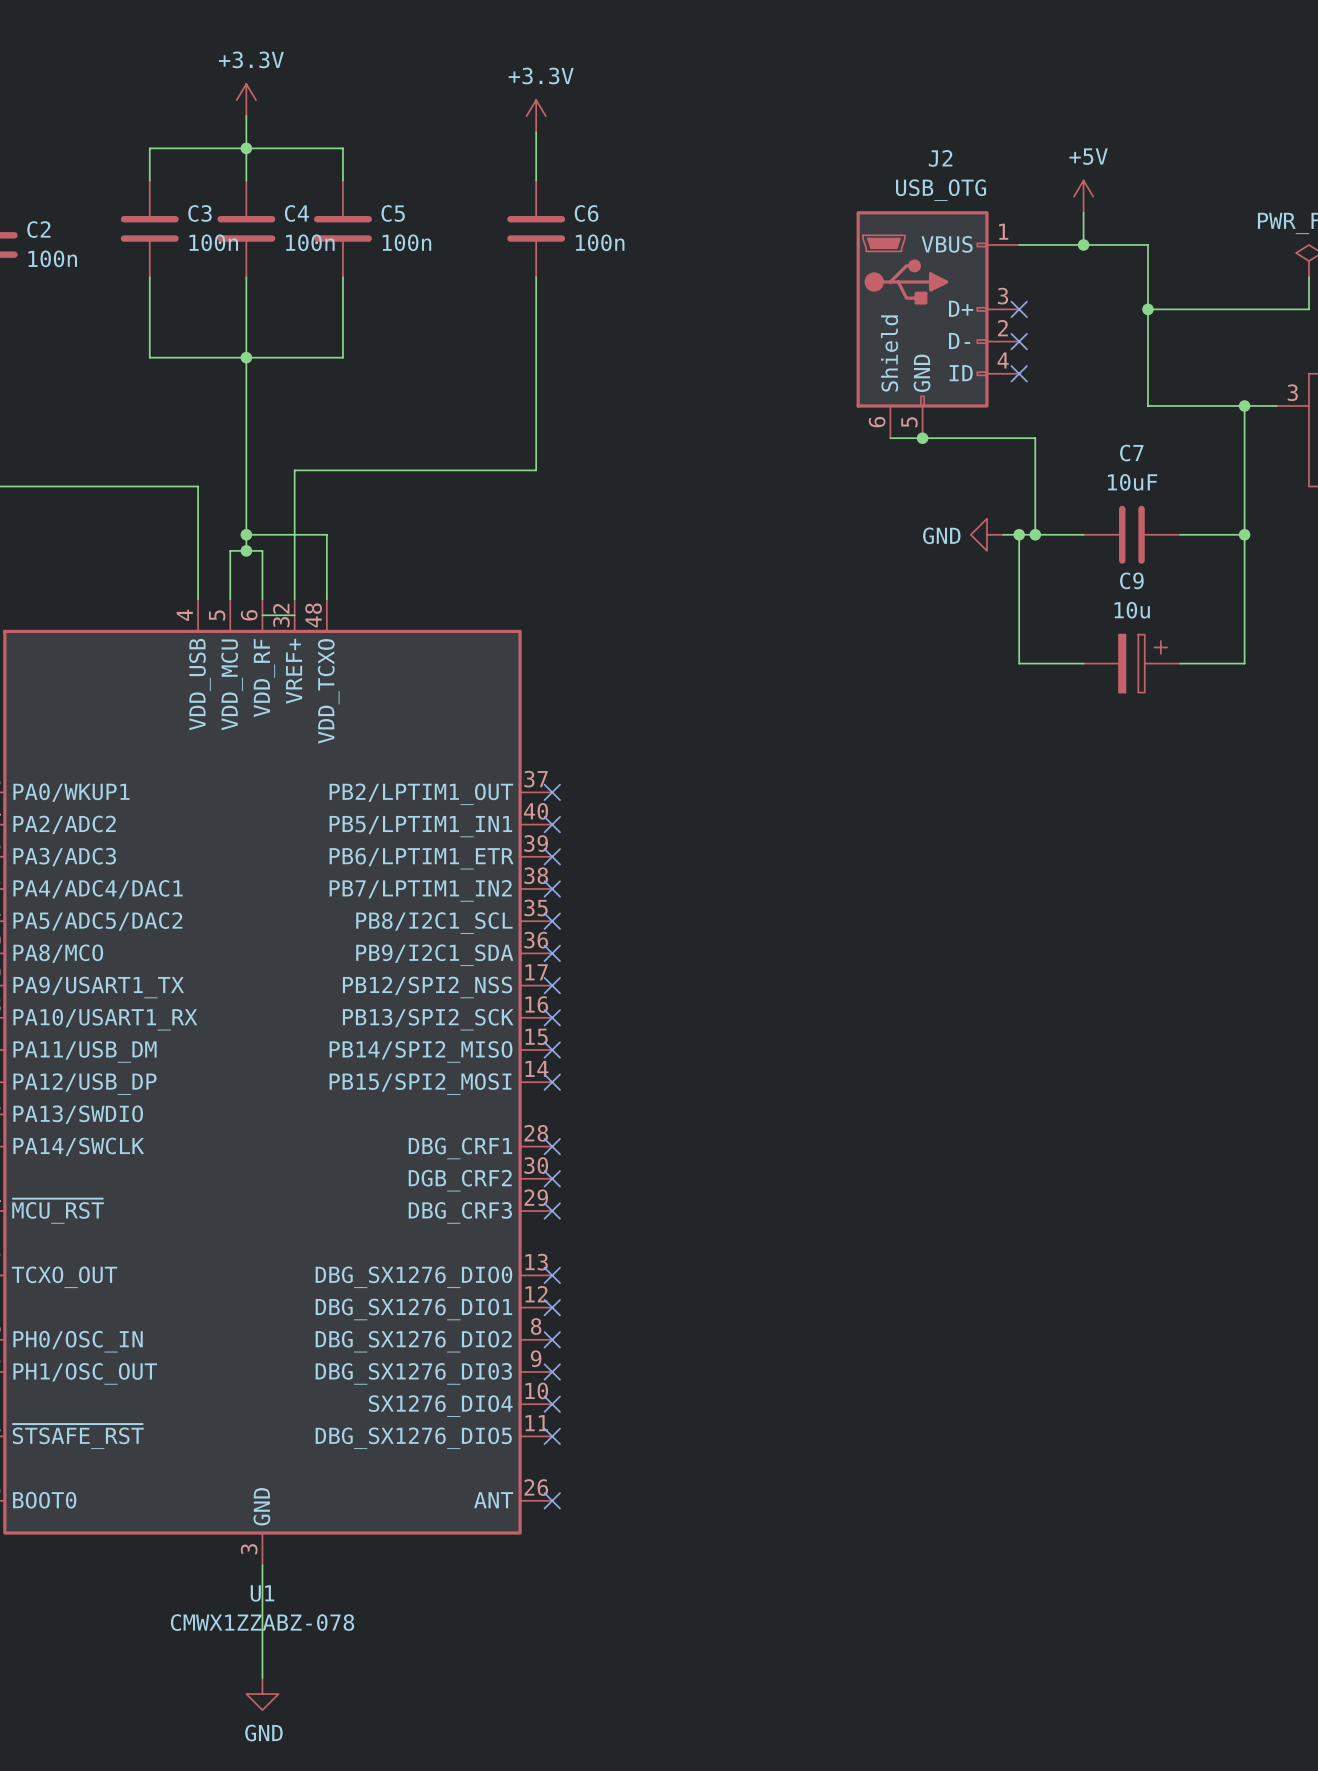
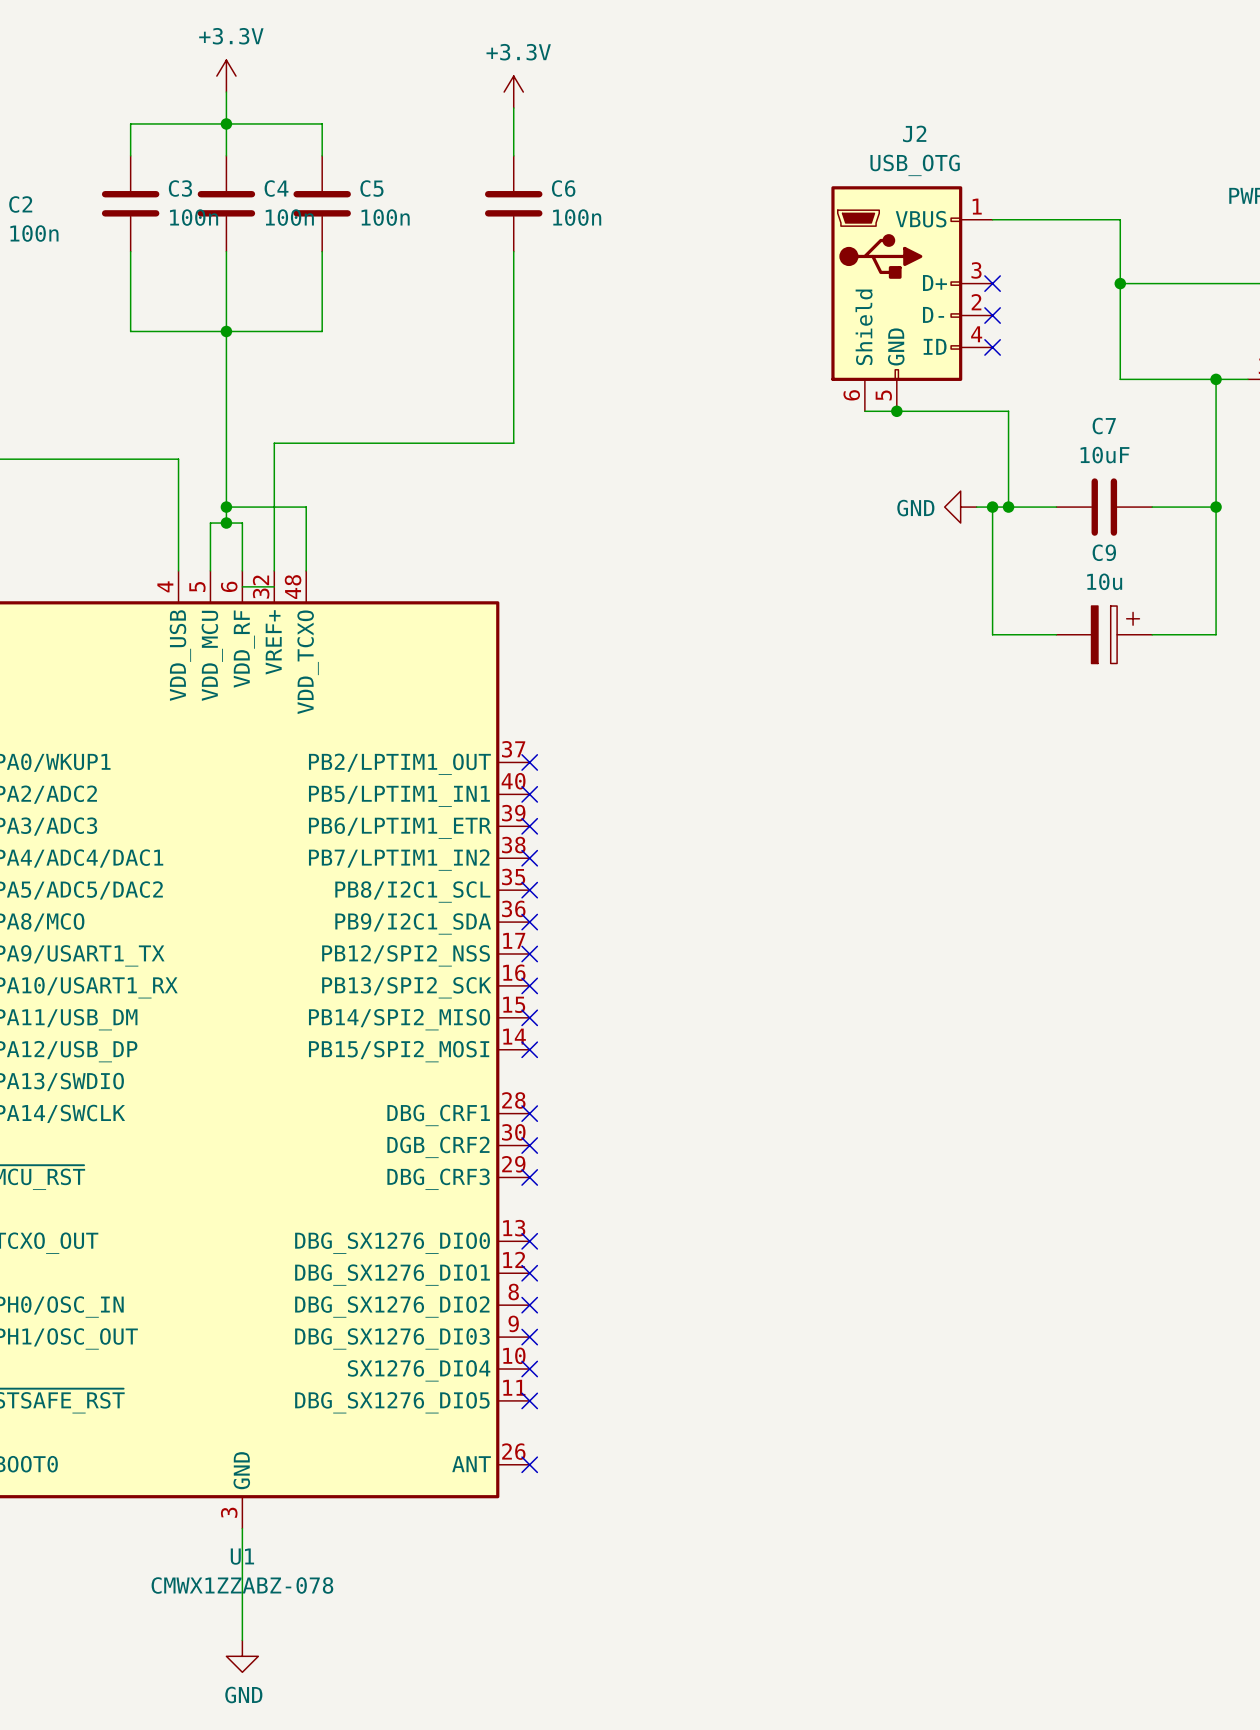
power symbol: +5V (1083, 196) -> none
wire: (1083, 212) (1083, 244) -> none
junction: (1083, 244) -> none

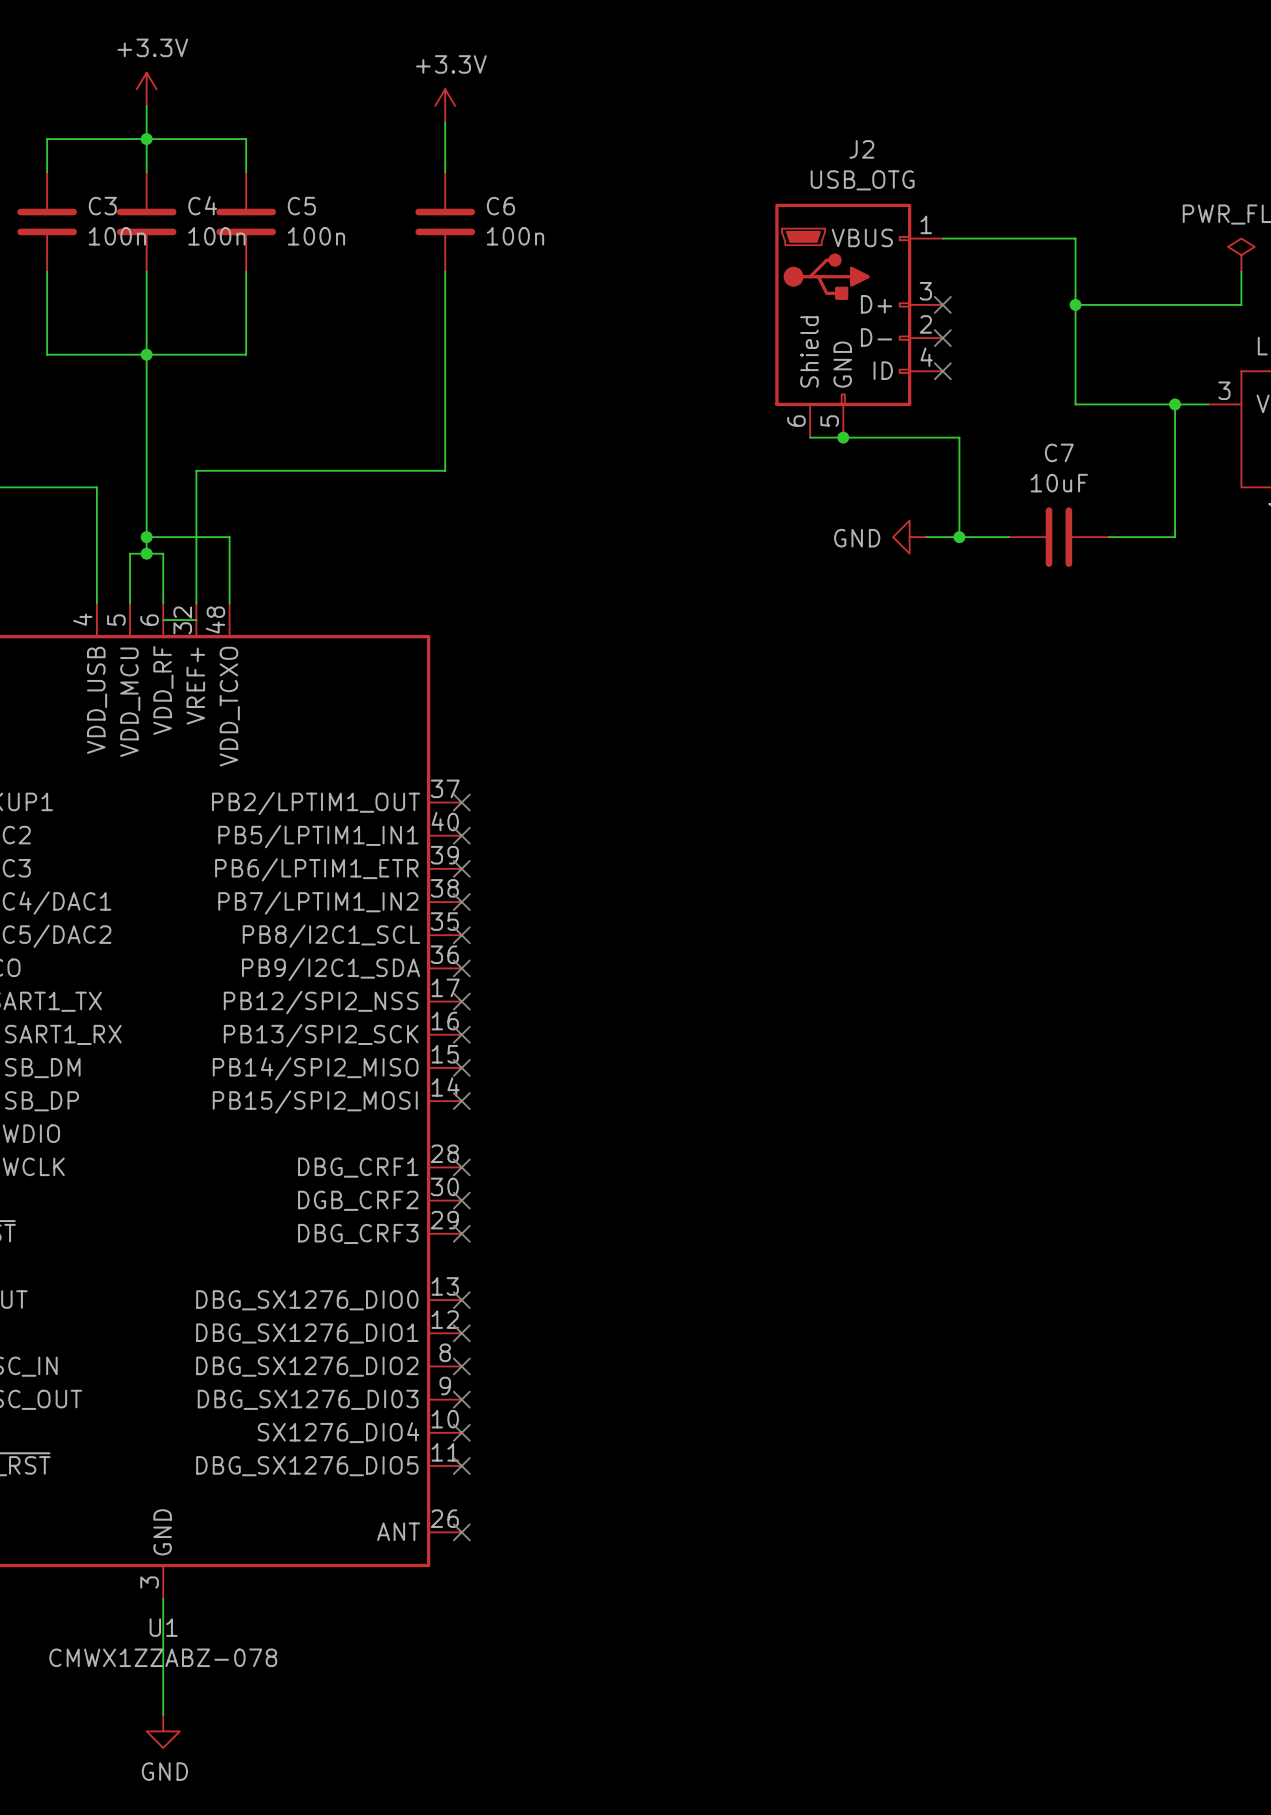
wire: (992, 507) (992, 634) (1056, 634) -> none
junction: (992, 507) -> none
wire: (1216, 507) (1216, 634) (1152, 634) -> none
junction: (1216, 507) -> none
C9: 10u (1104, 634) -> none

